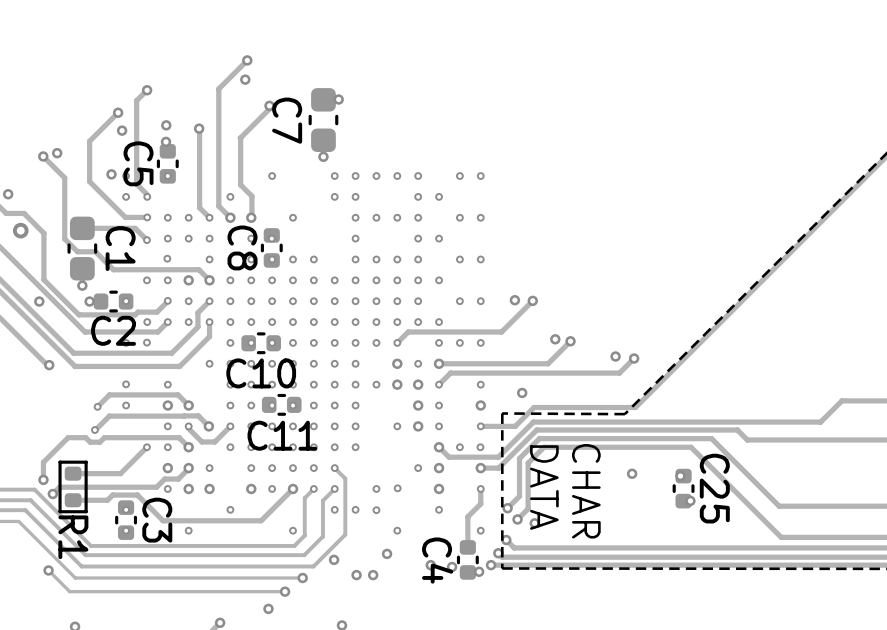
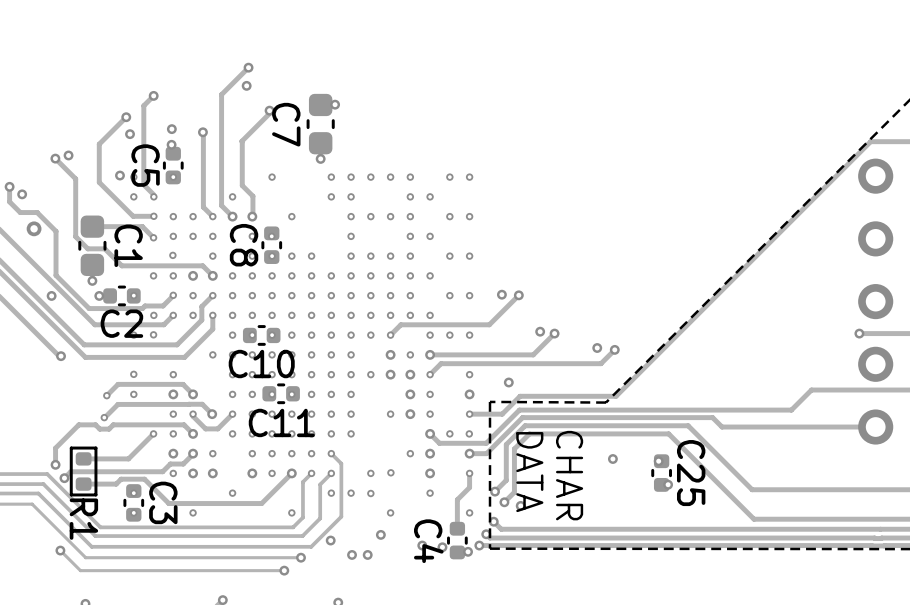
via: (268, 608) -> none

